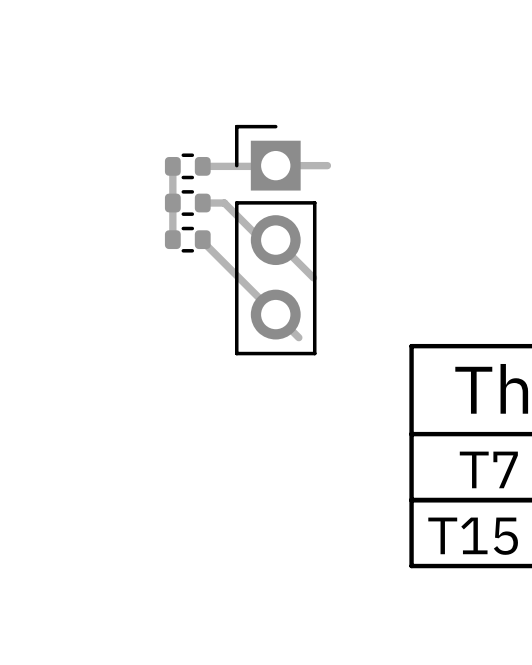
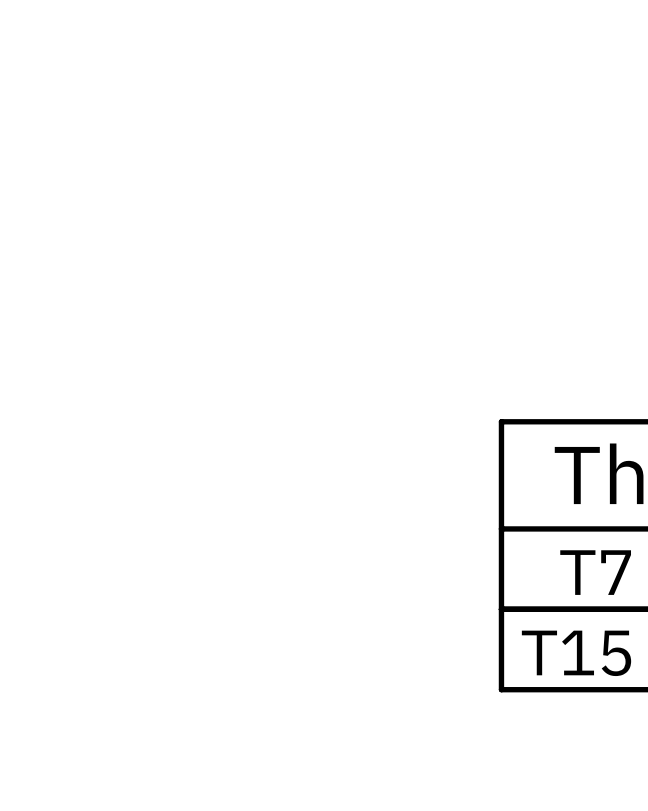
track: (327, 165) (202, 166) -> none
track: (172, 166) (172, 239) -> none
part: (187, 166) -> none
part: (187, 203) -> none
track: (202, 203) (224, 203) (261, 240) (275, 240) (313, 277) -> none
part: (187, 239) -> none
track: (202, 239) (298, 337) -> none
part: (275, 240) -> none

